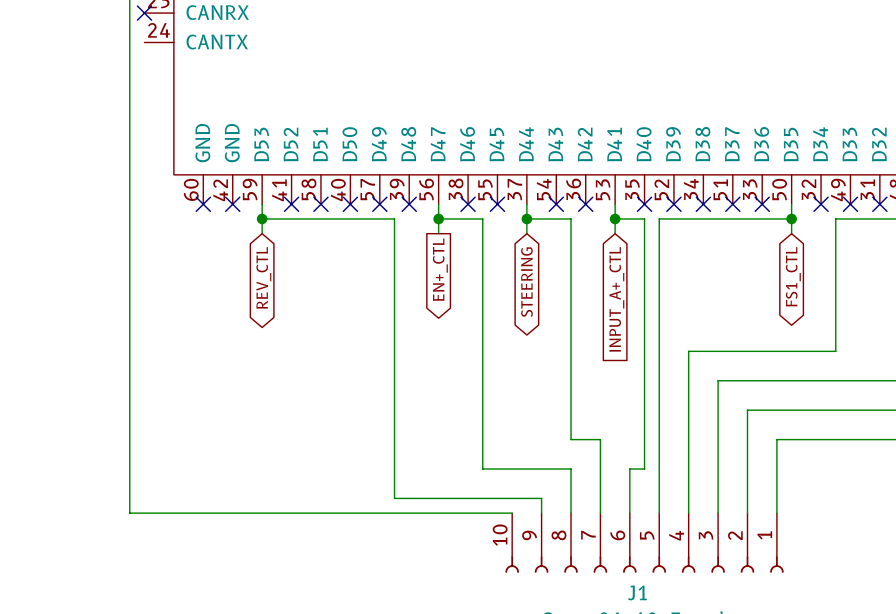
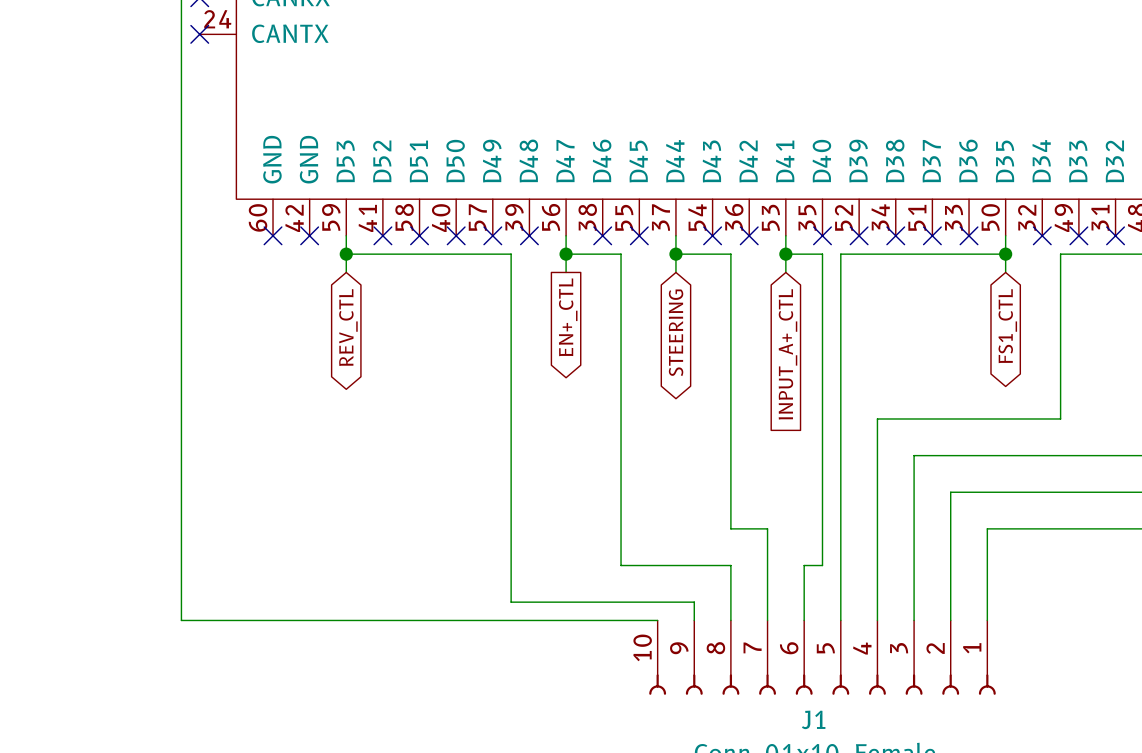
no-connect mark: none -> (199, 34)

